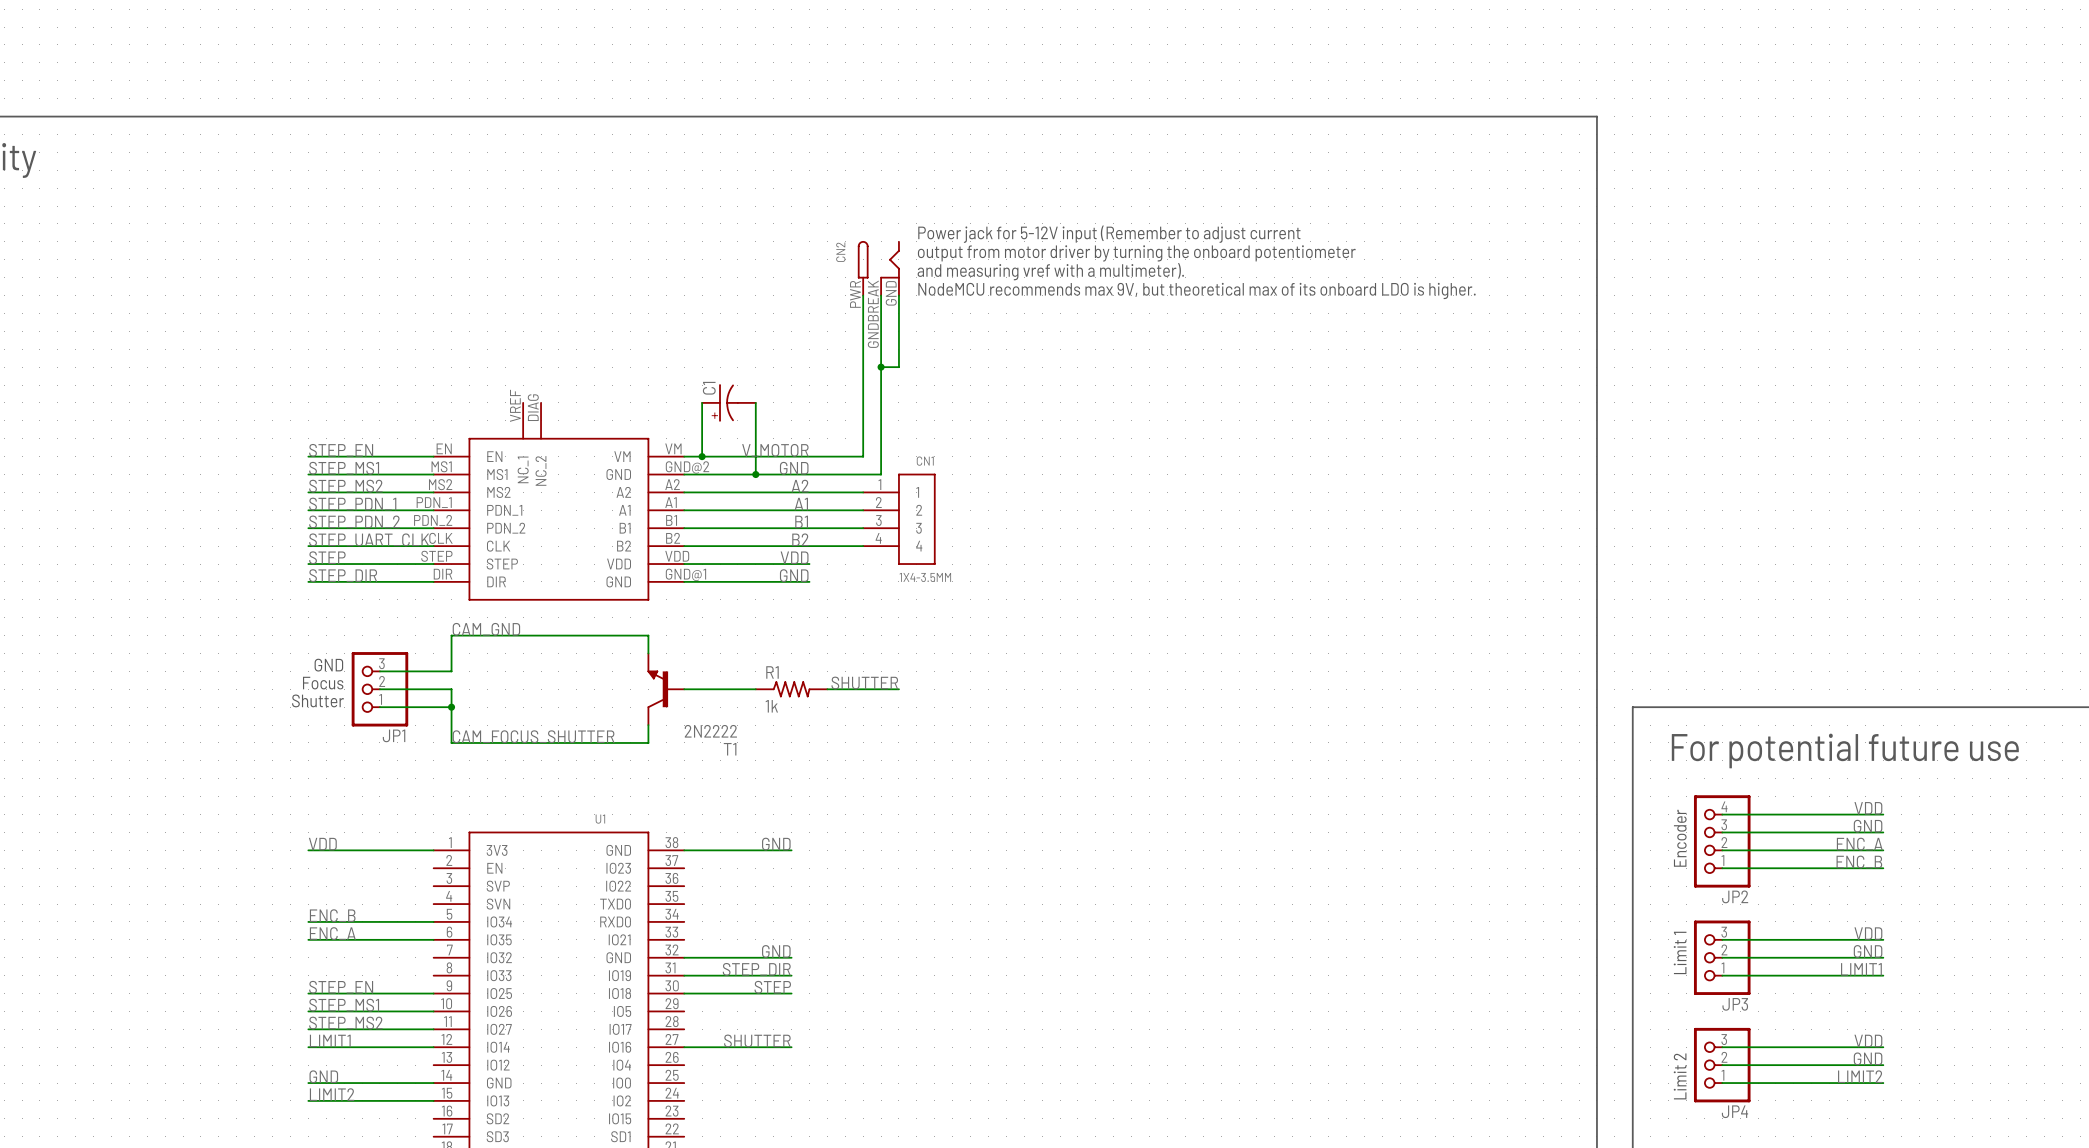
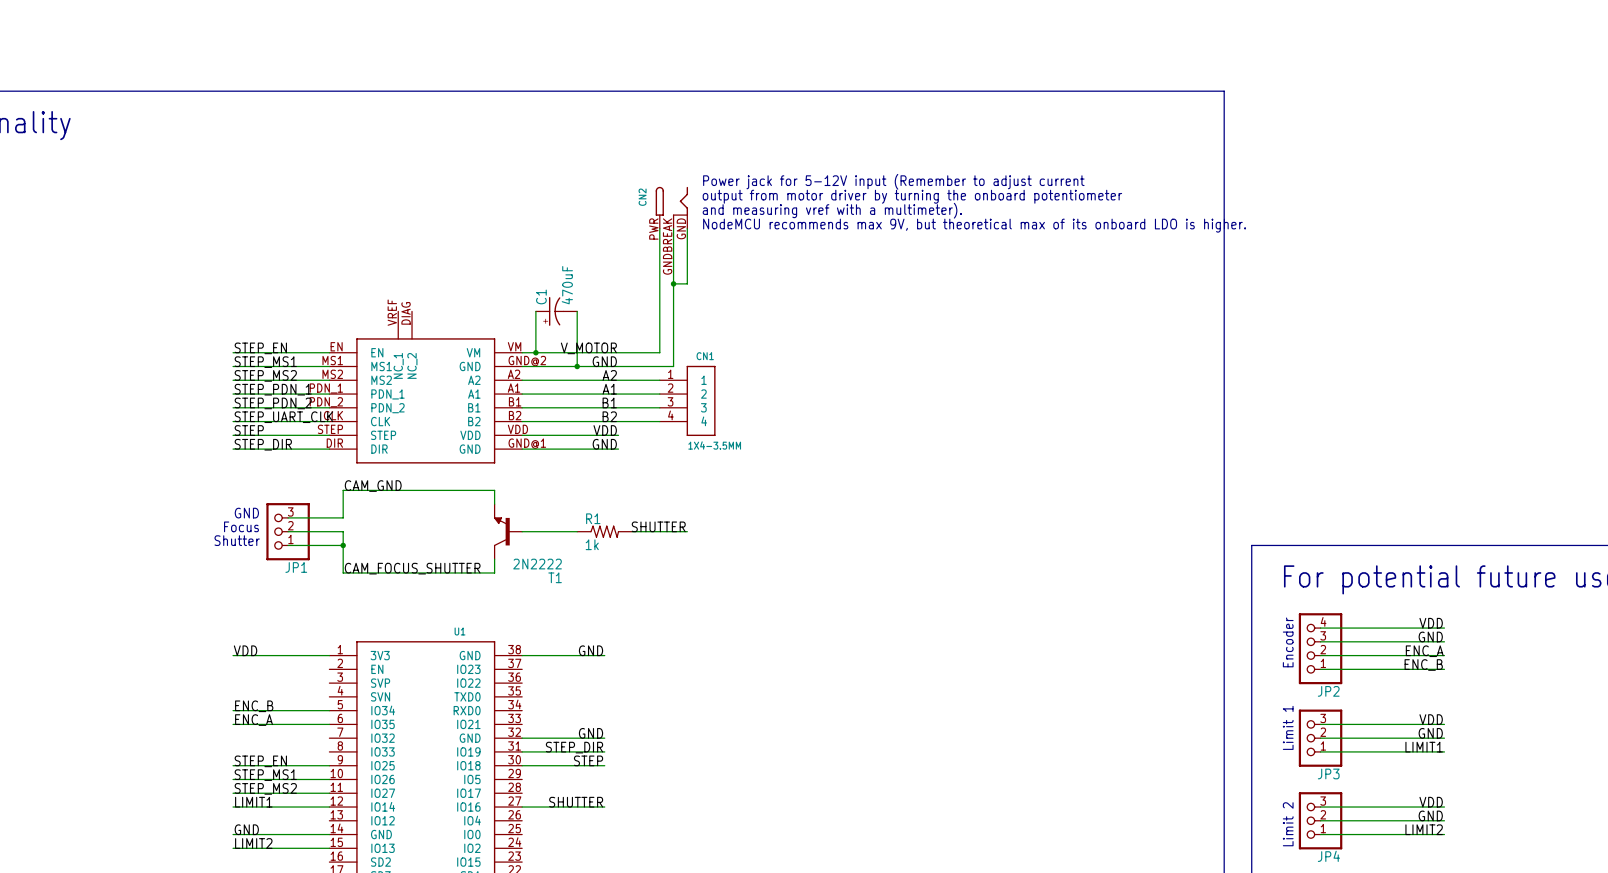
C1 value: none -> 470uF (567, 285)

